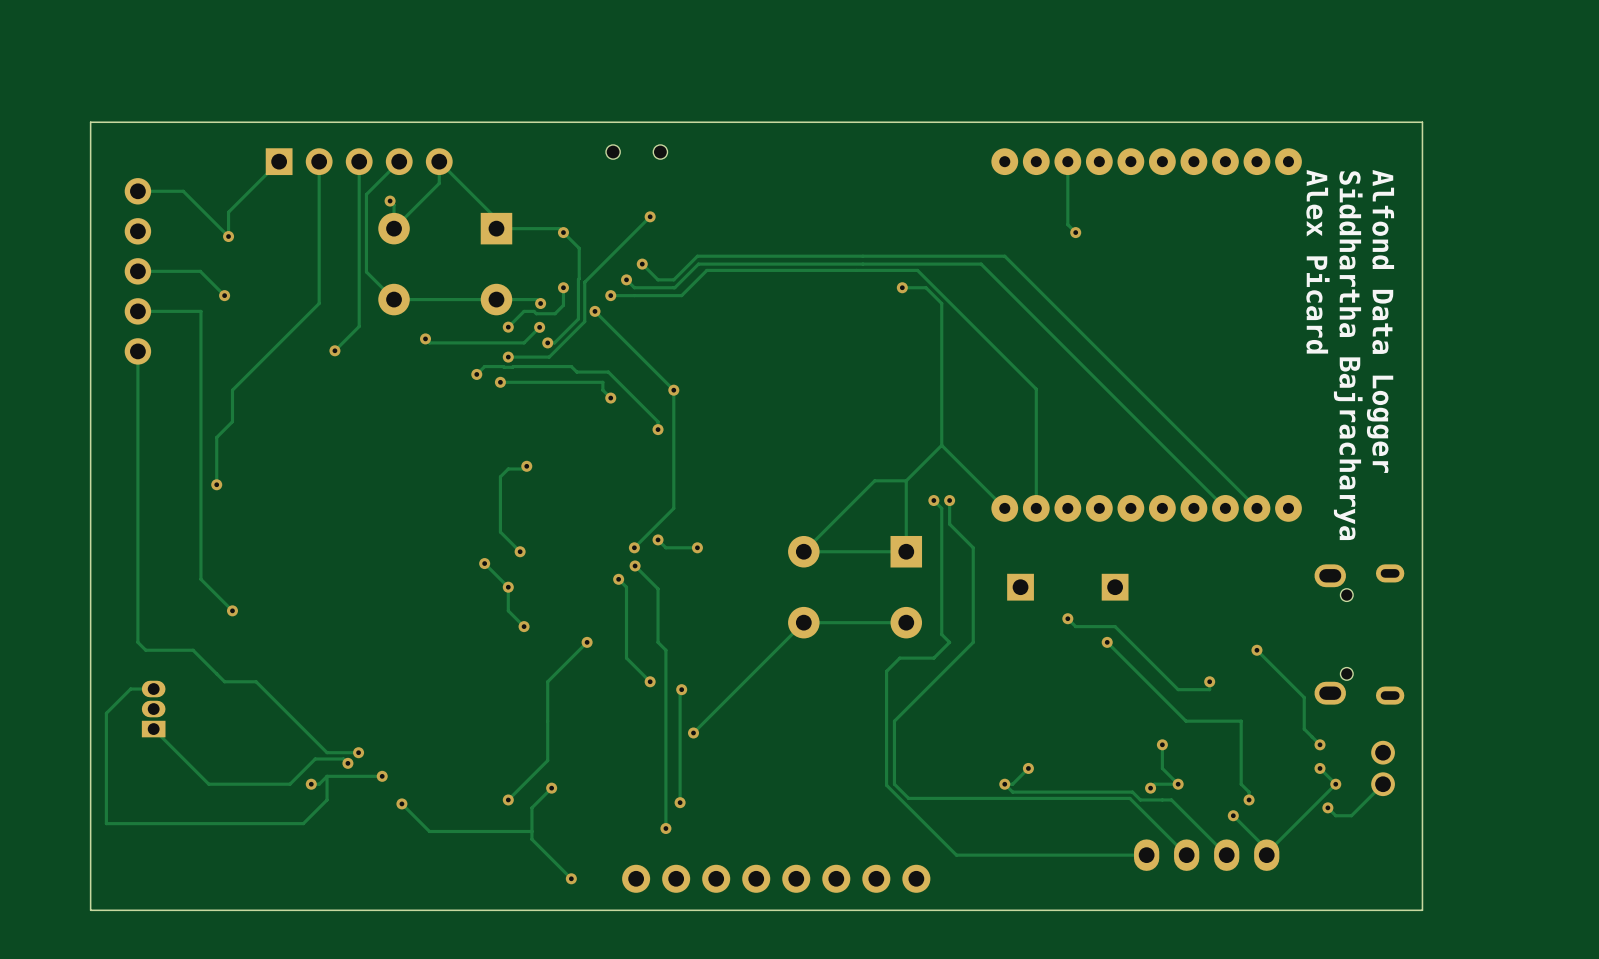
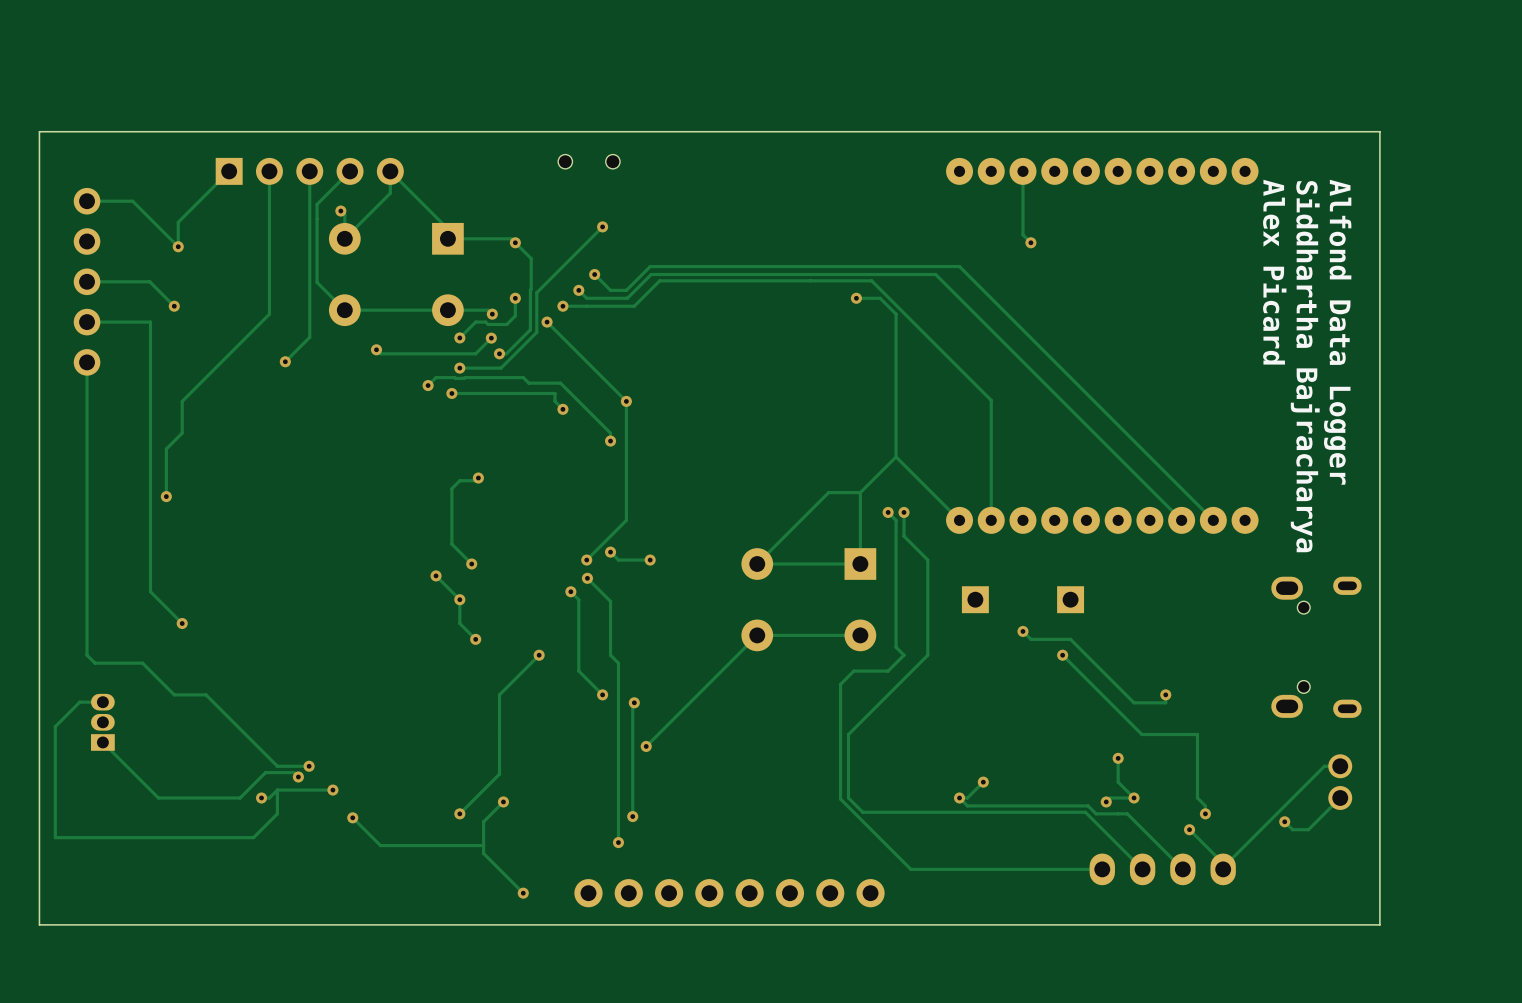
track: (1256, 650) (1304, 697) (1304, 729) (1320, 744) -> none
via: (1256, 650) -> none
via: (1320, 744) -> none
track: (1320, 768) (1335, 784) -> (1340, 766) (1324, 766) (1292, 797)
via: (1320, 768) -> none
via: (1335, 784) -> none

